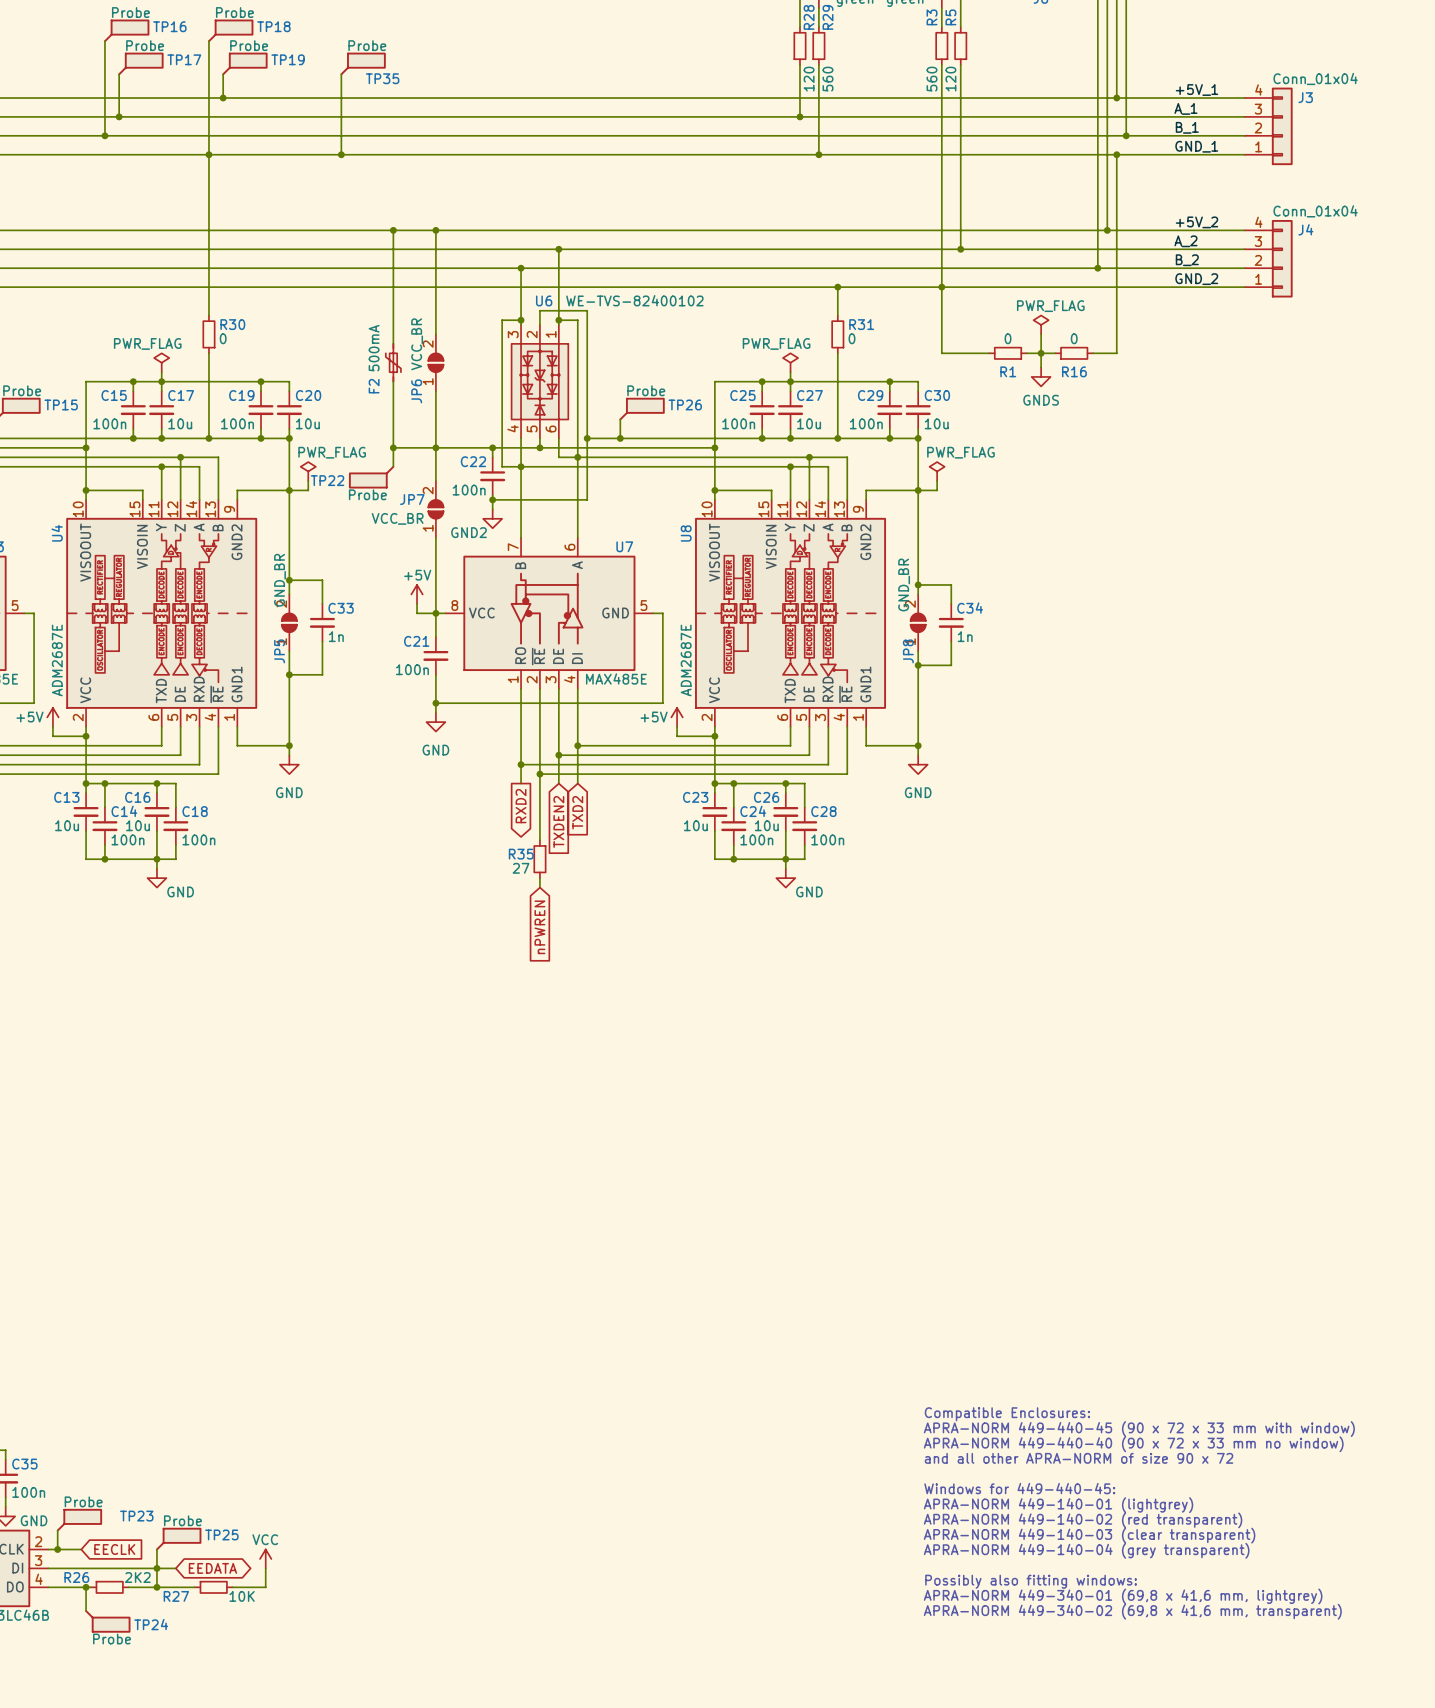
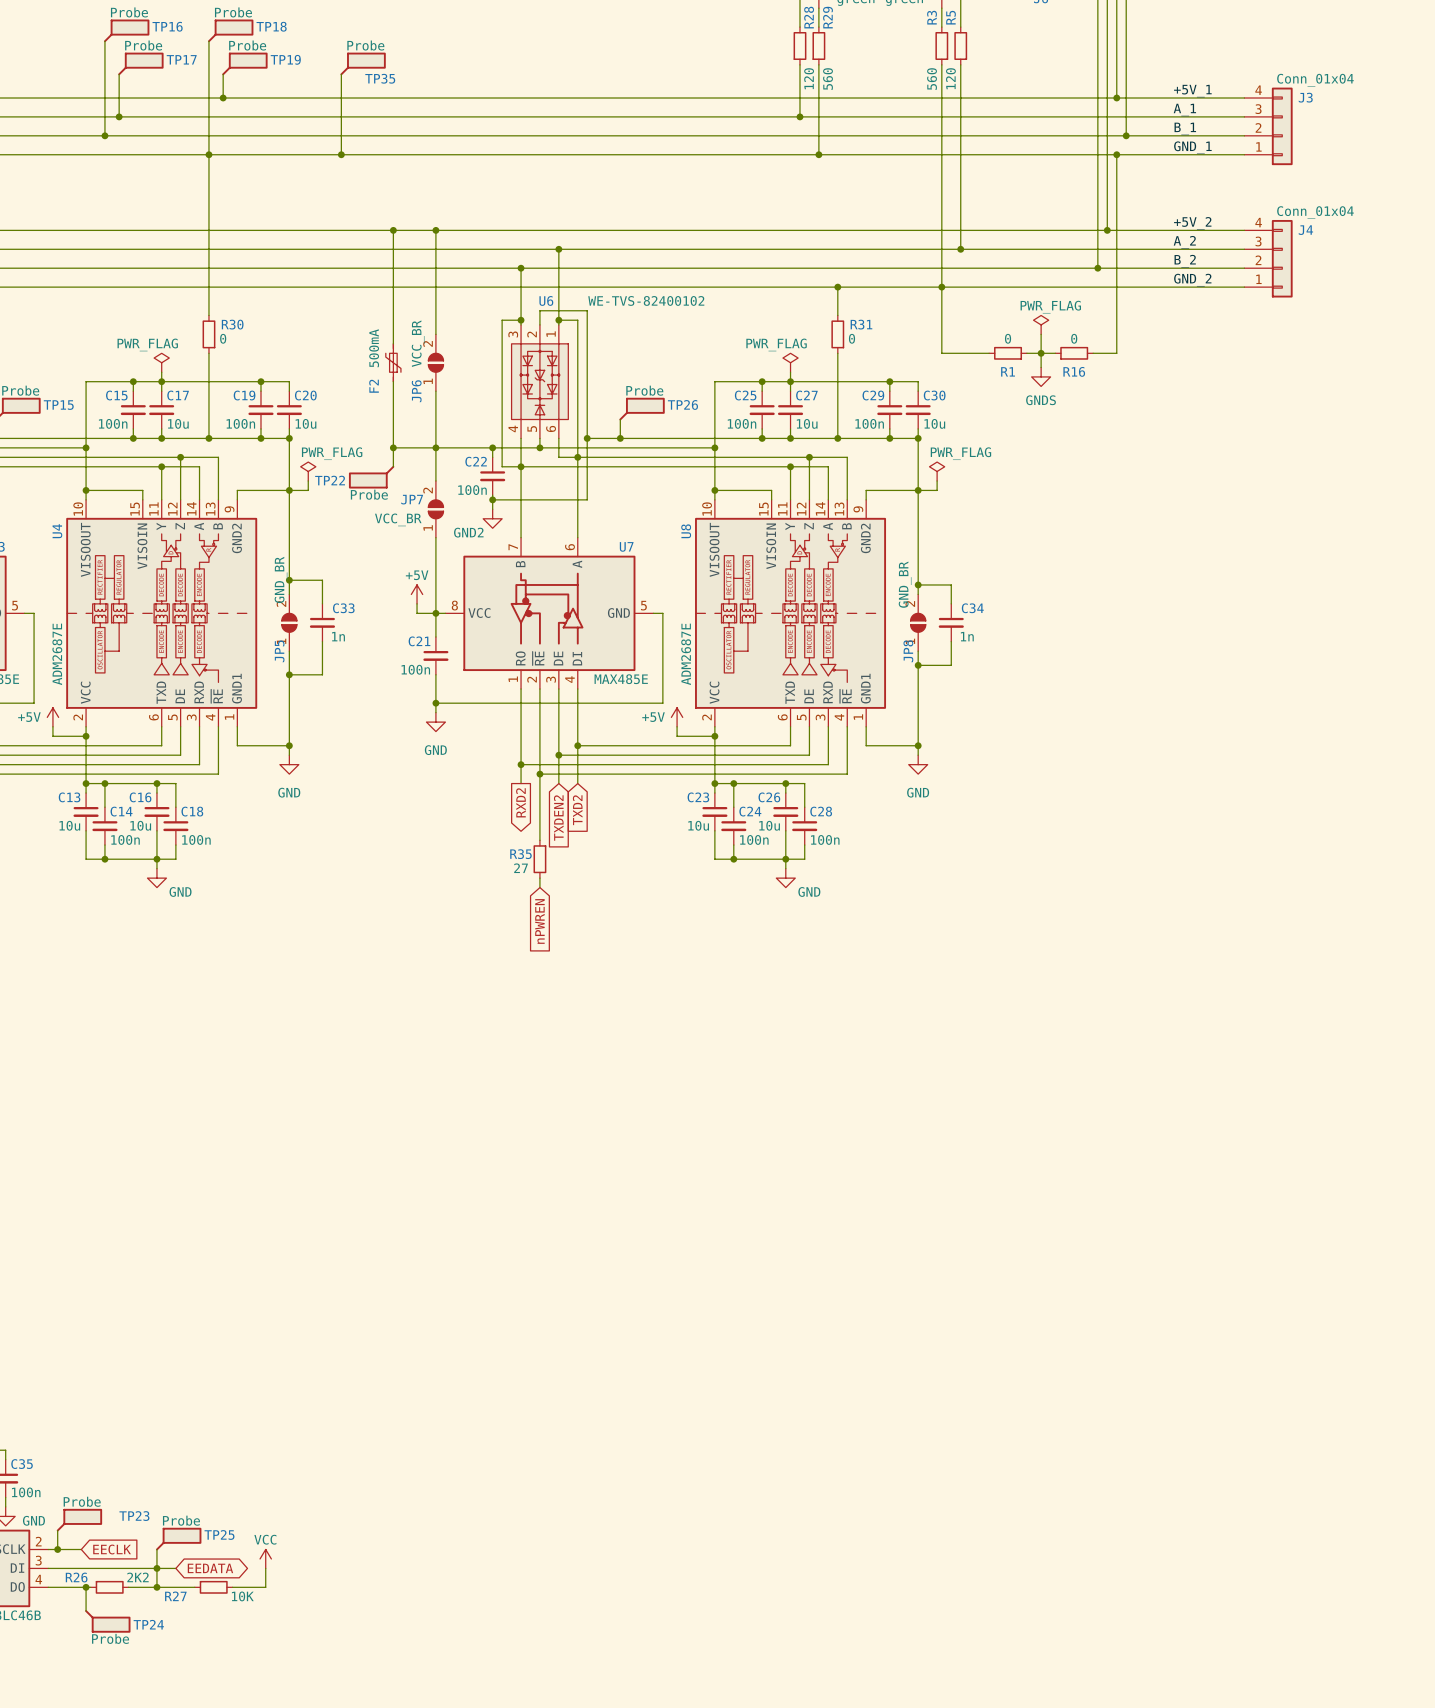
text: Compatible Enclosures: (1007, 1414) -> none
text: APRA-NORM 449-440-45 (90 x 72 x 33 mm with window) (1139, 1429) -> none
text: APRA-NORM 449-440-40 (90 x 72 x 33 mm no window) (1133, 1444) -> none
text: and all other APRA-NORM of size 90 x 72 (1079, 1458) -> none
text: Windows for 449-440-45: (1019, 1488) -> none
text: APRA-NORM 449-140-01 (lightgrey) (1058, 1505) -> none
text: APRA-NORM 449-140-02 (red transparent) (1083, 1520) -> none
text: APRA-NORM 449-140-03 (clear transparent) (1089, 1535) -> none
text: APRA-NORM 449-140-04 (grey transparent) (1086, 1550) -> none
text: Possibly also fitting windows: (1031, 1581) -> none
text: APRA-NORM 449-340-01 (69,8 x 41,6 mm, lightgrey) (1123, 1596) -> none
text: APRA-NORM 449-340-02 (69,8 x 41,6 mm, transparent) (1132, 1611) -> none

